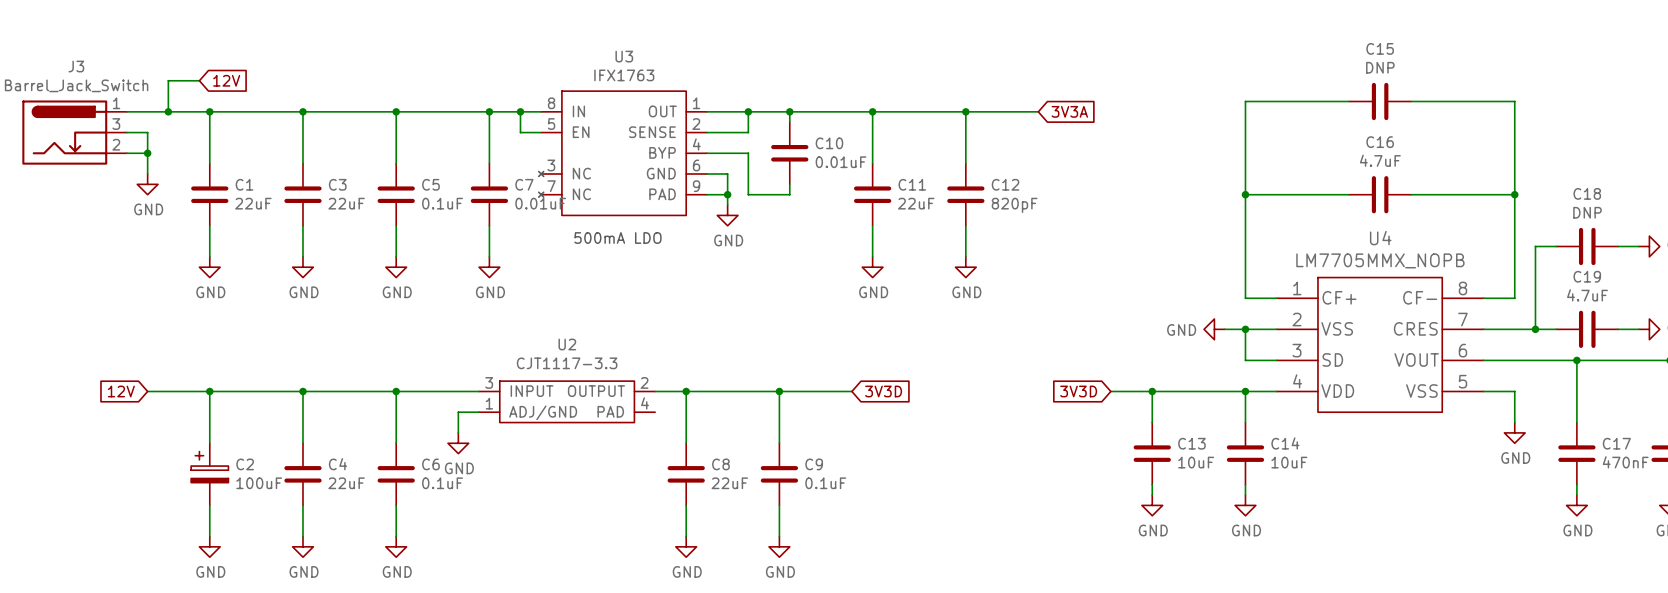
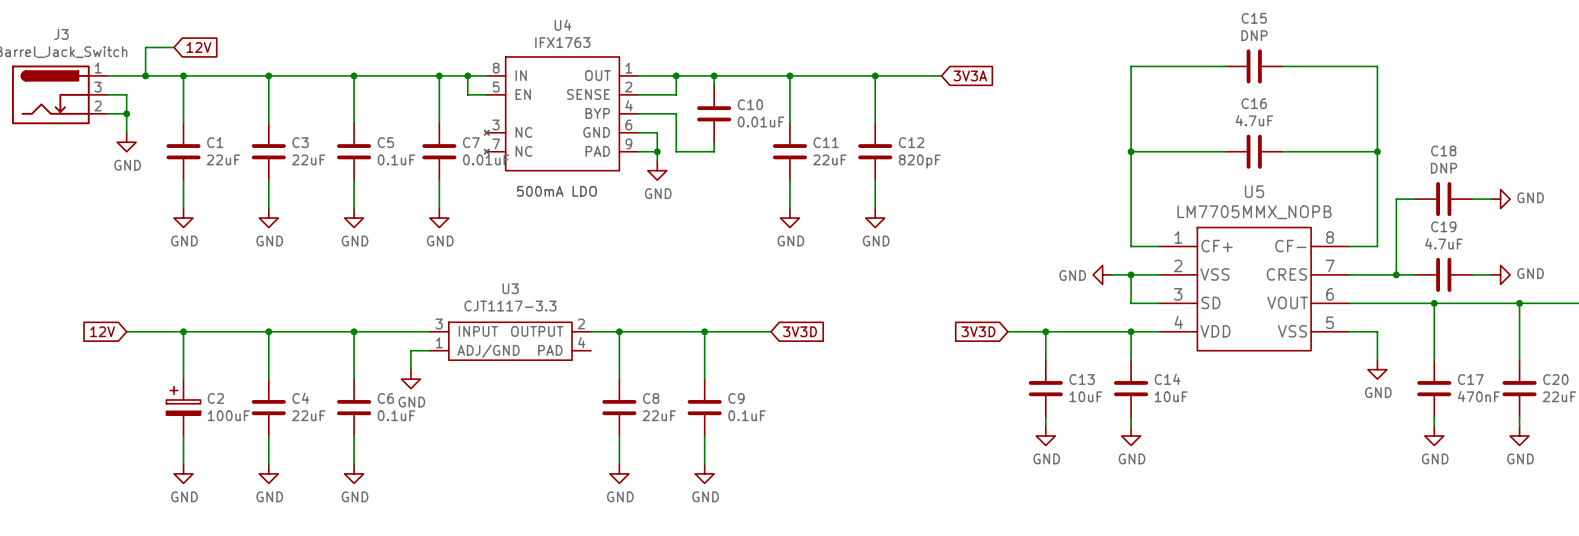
U3 name: U3 (624, 56) -> U4 (562, 25)
U4 name: U4 (1380, 238) -> U5 (1254, 191)
U2 name: U2 (567, 344) -> U3 (510, 288)

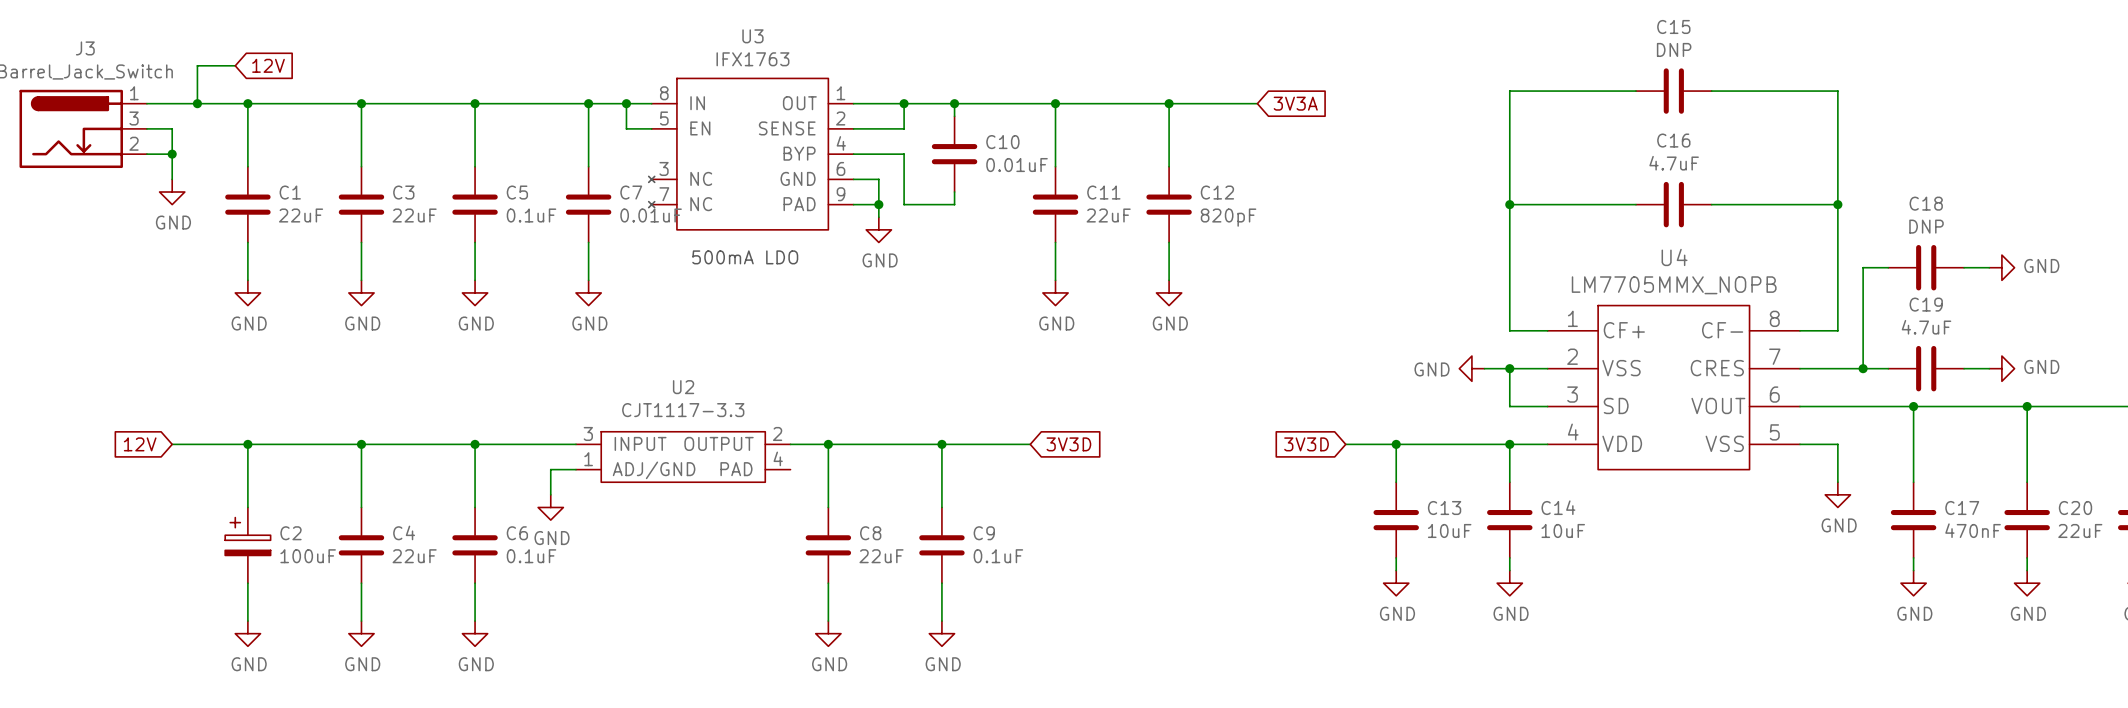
U4 name: U4 (562, 25) -> U3 (752, 36)
U5 name: U5 (1254, 191) -> U4 (1674, 257)
U3 name: U3 (510, 288) -> U2 (683, 387)

